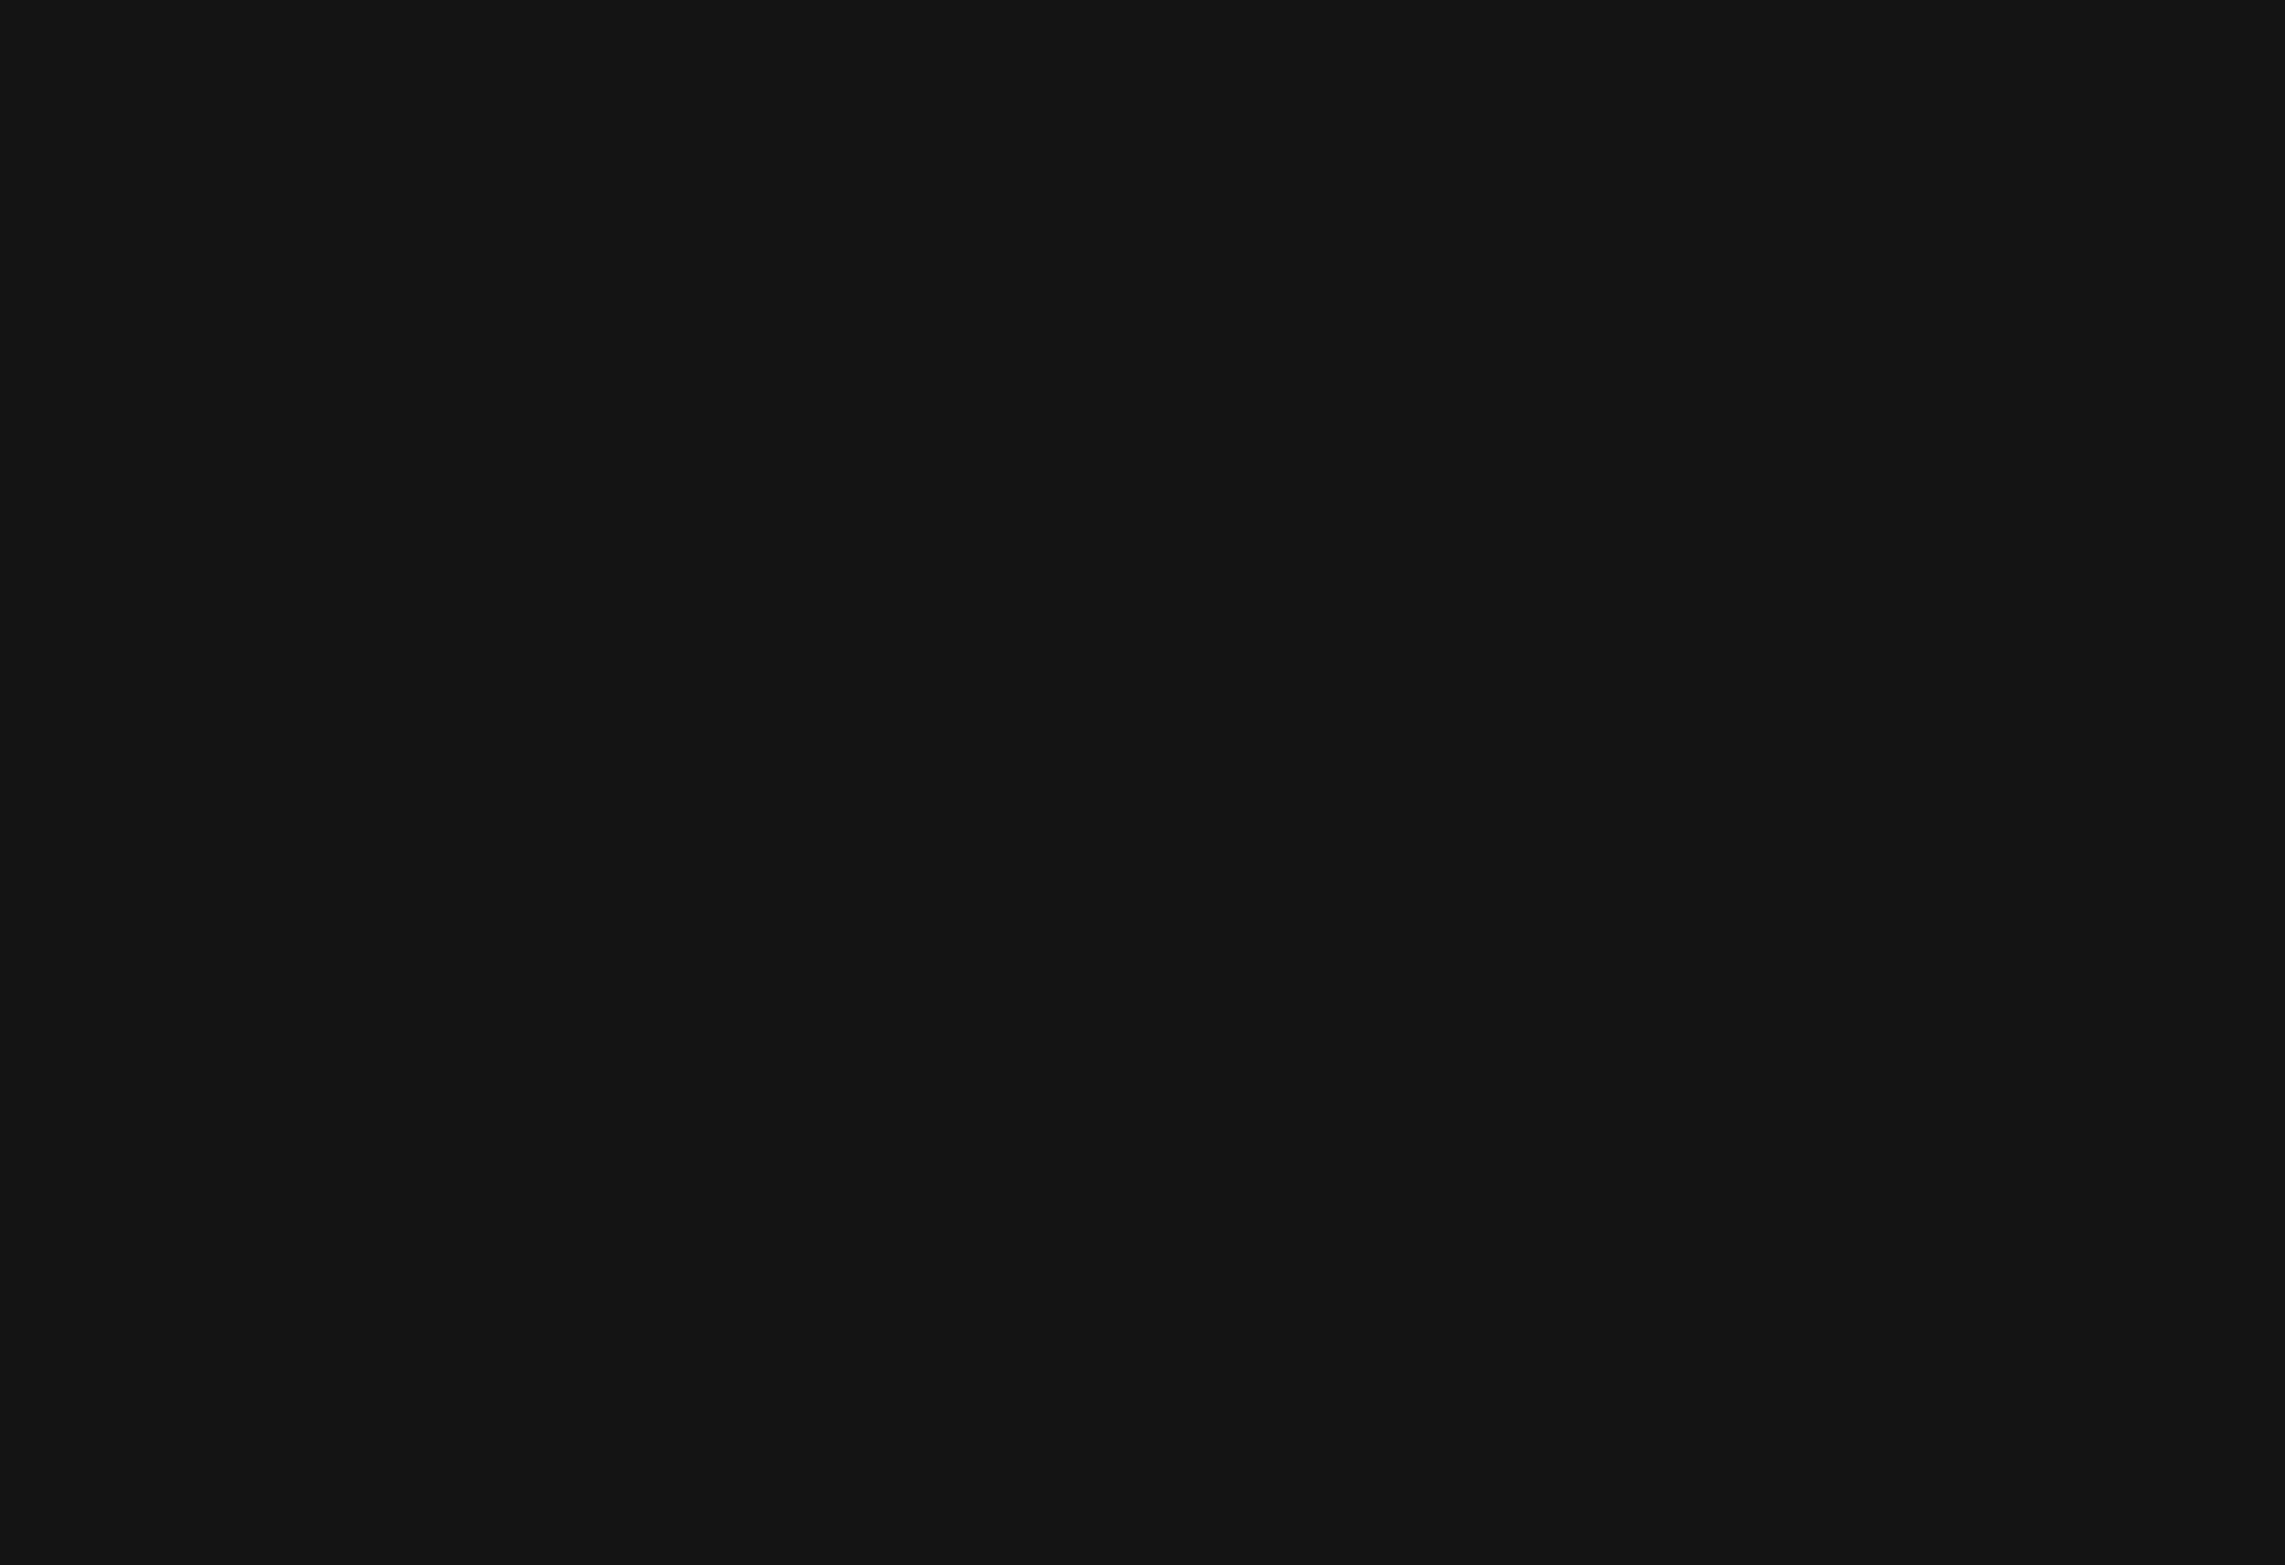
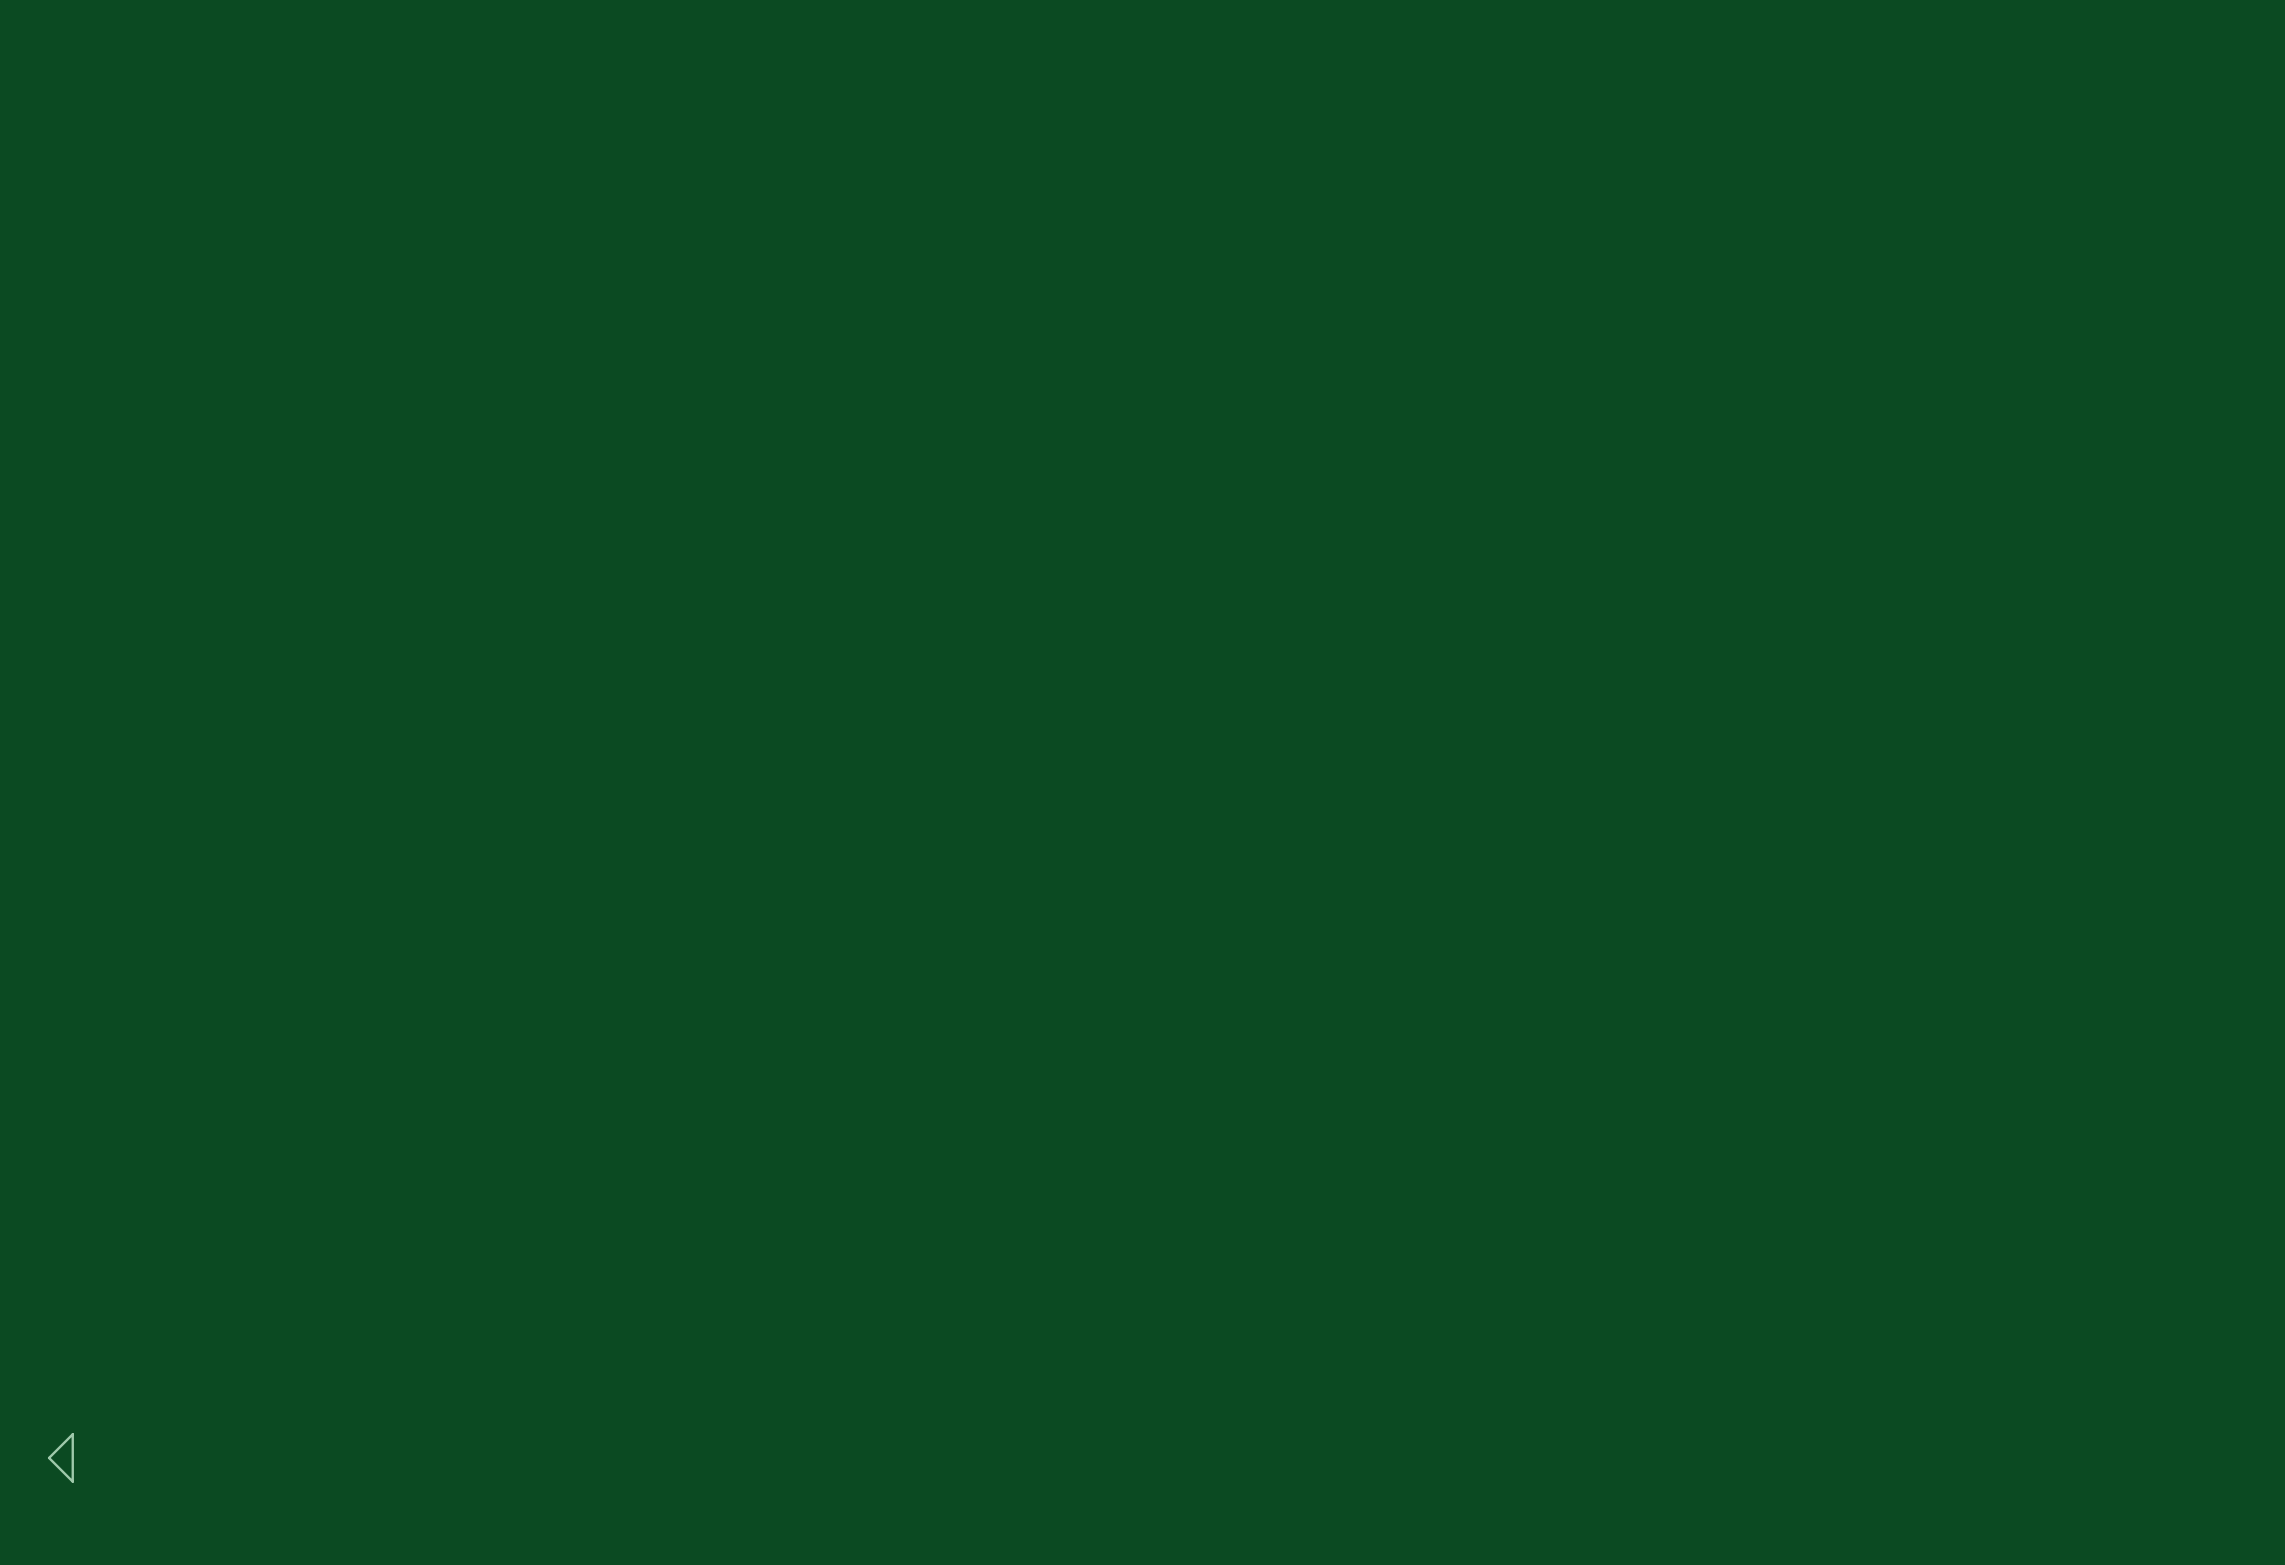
line: none -> (72, 1434) (72, 1481) (49, 1457) (72, 1434)

